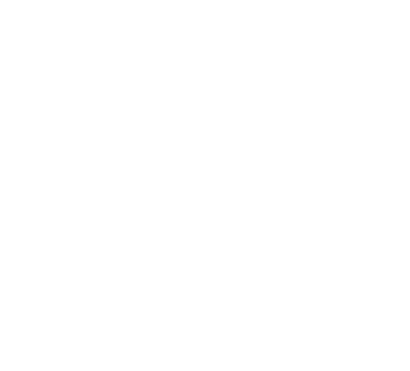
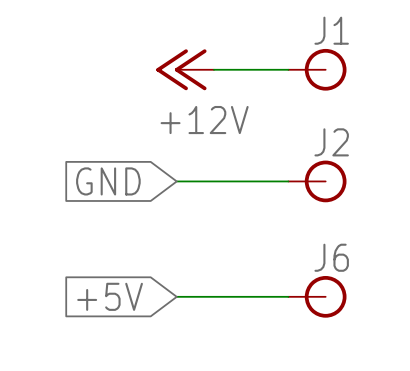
power symbol: none -> +12V (185, 69)
wire: none -> (213, 69) (288, 69)
J1: none -> (317, 69)
global label: none -> GND (108, 181)
wire: none -> (176, 181) (288, 181)
J2: none -> (317, 181)
global label: none -> +5V (110, 296)
wire: none -> (176, 296) (288, 296)
J6: none -> (317, 296)

